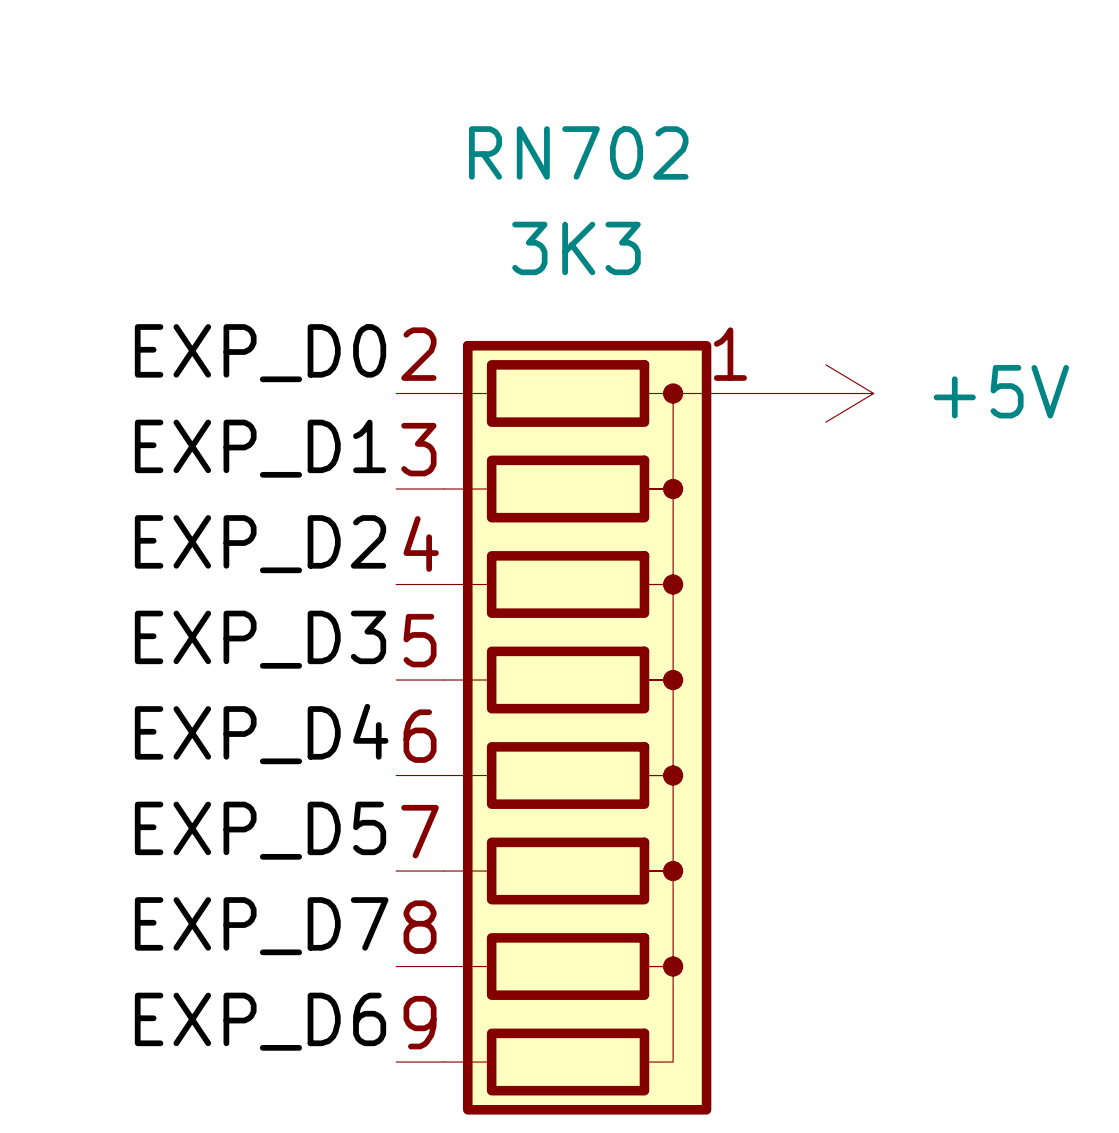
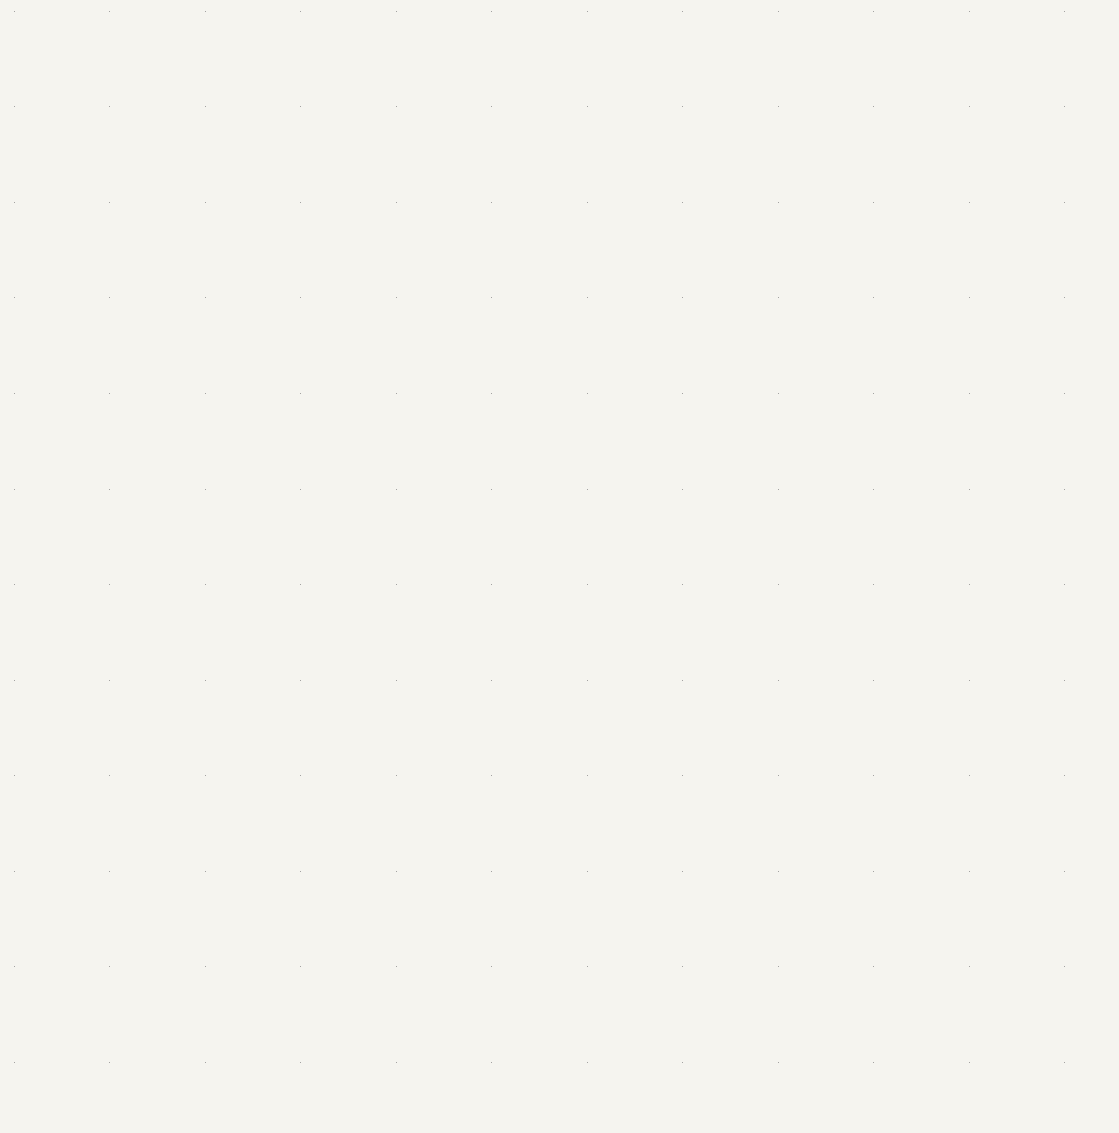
label: EXP_D0 (260, 353) -> none
power symbol: +5V (825, 393) -> none
label: EXP_D1 (260, 448) -> none
label: EXP_D2 (260, 544) -> none
label: EXP_D3 (260, 639) -> none
RN702: 3K3 (587, 727) -> none
label: EXP_D4 (261, 734) -> none
label: EXP_D5 (260, 830) -> none
label: EXP_D7 (261, 926) -> none
label: EXP_D6 (260, 1021) -> none

